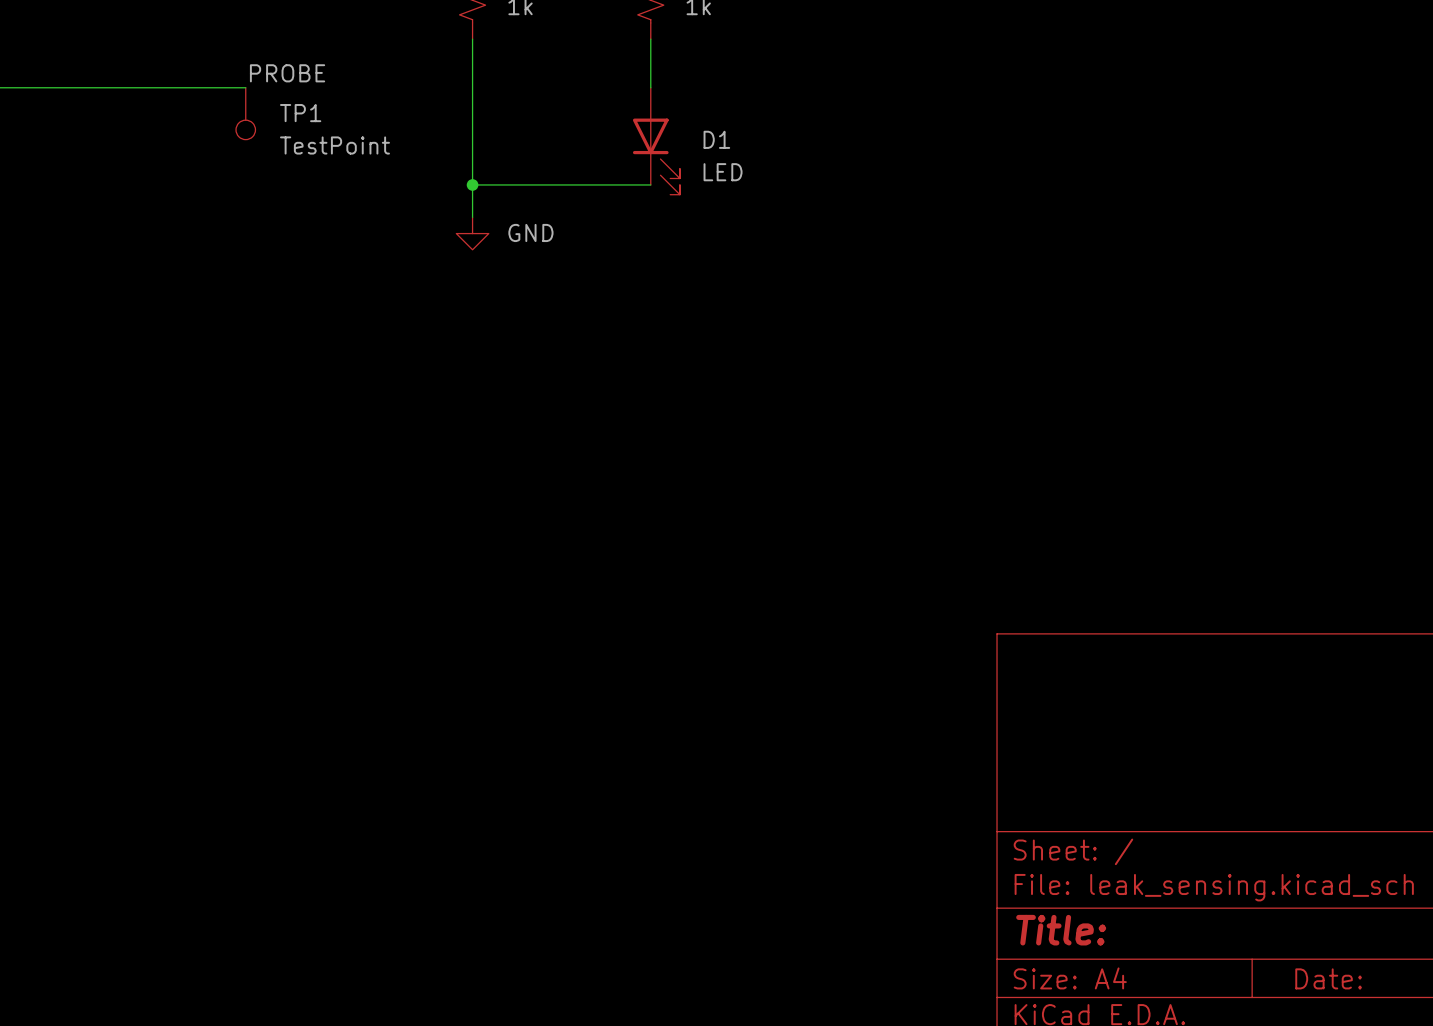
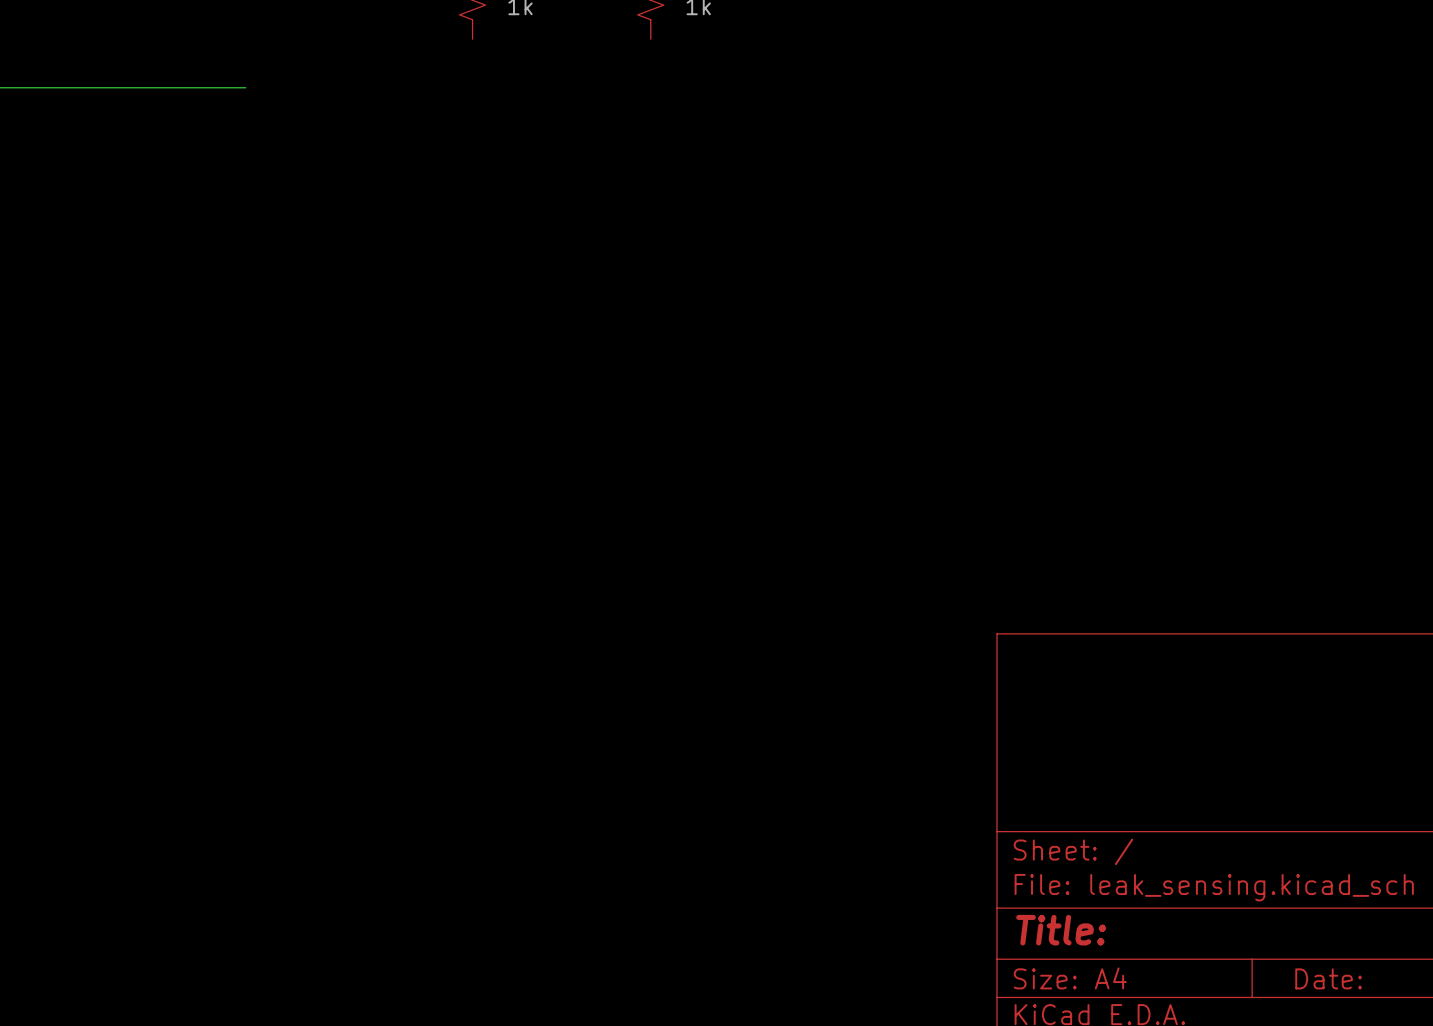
wire: (472, 39) (472, 217) -> none
wire: (650, 39) (650, 87) -> none
label: PROBE (287, 73) -> none
TP1: TestPoint (245, 113) -> none
D1: LED (656, 141) -> none
wire: (472, 184) (650, 184) -> none
junction: (472, 184) -> none
power symbol: GND (472, 233) -> none

